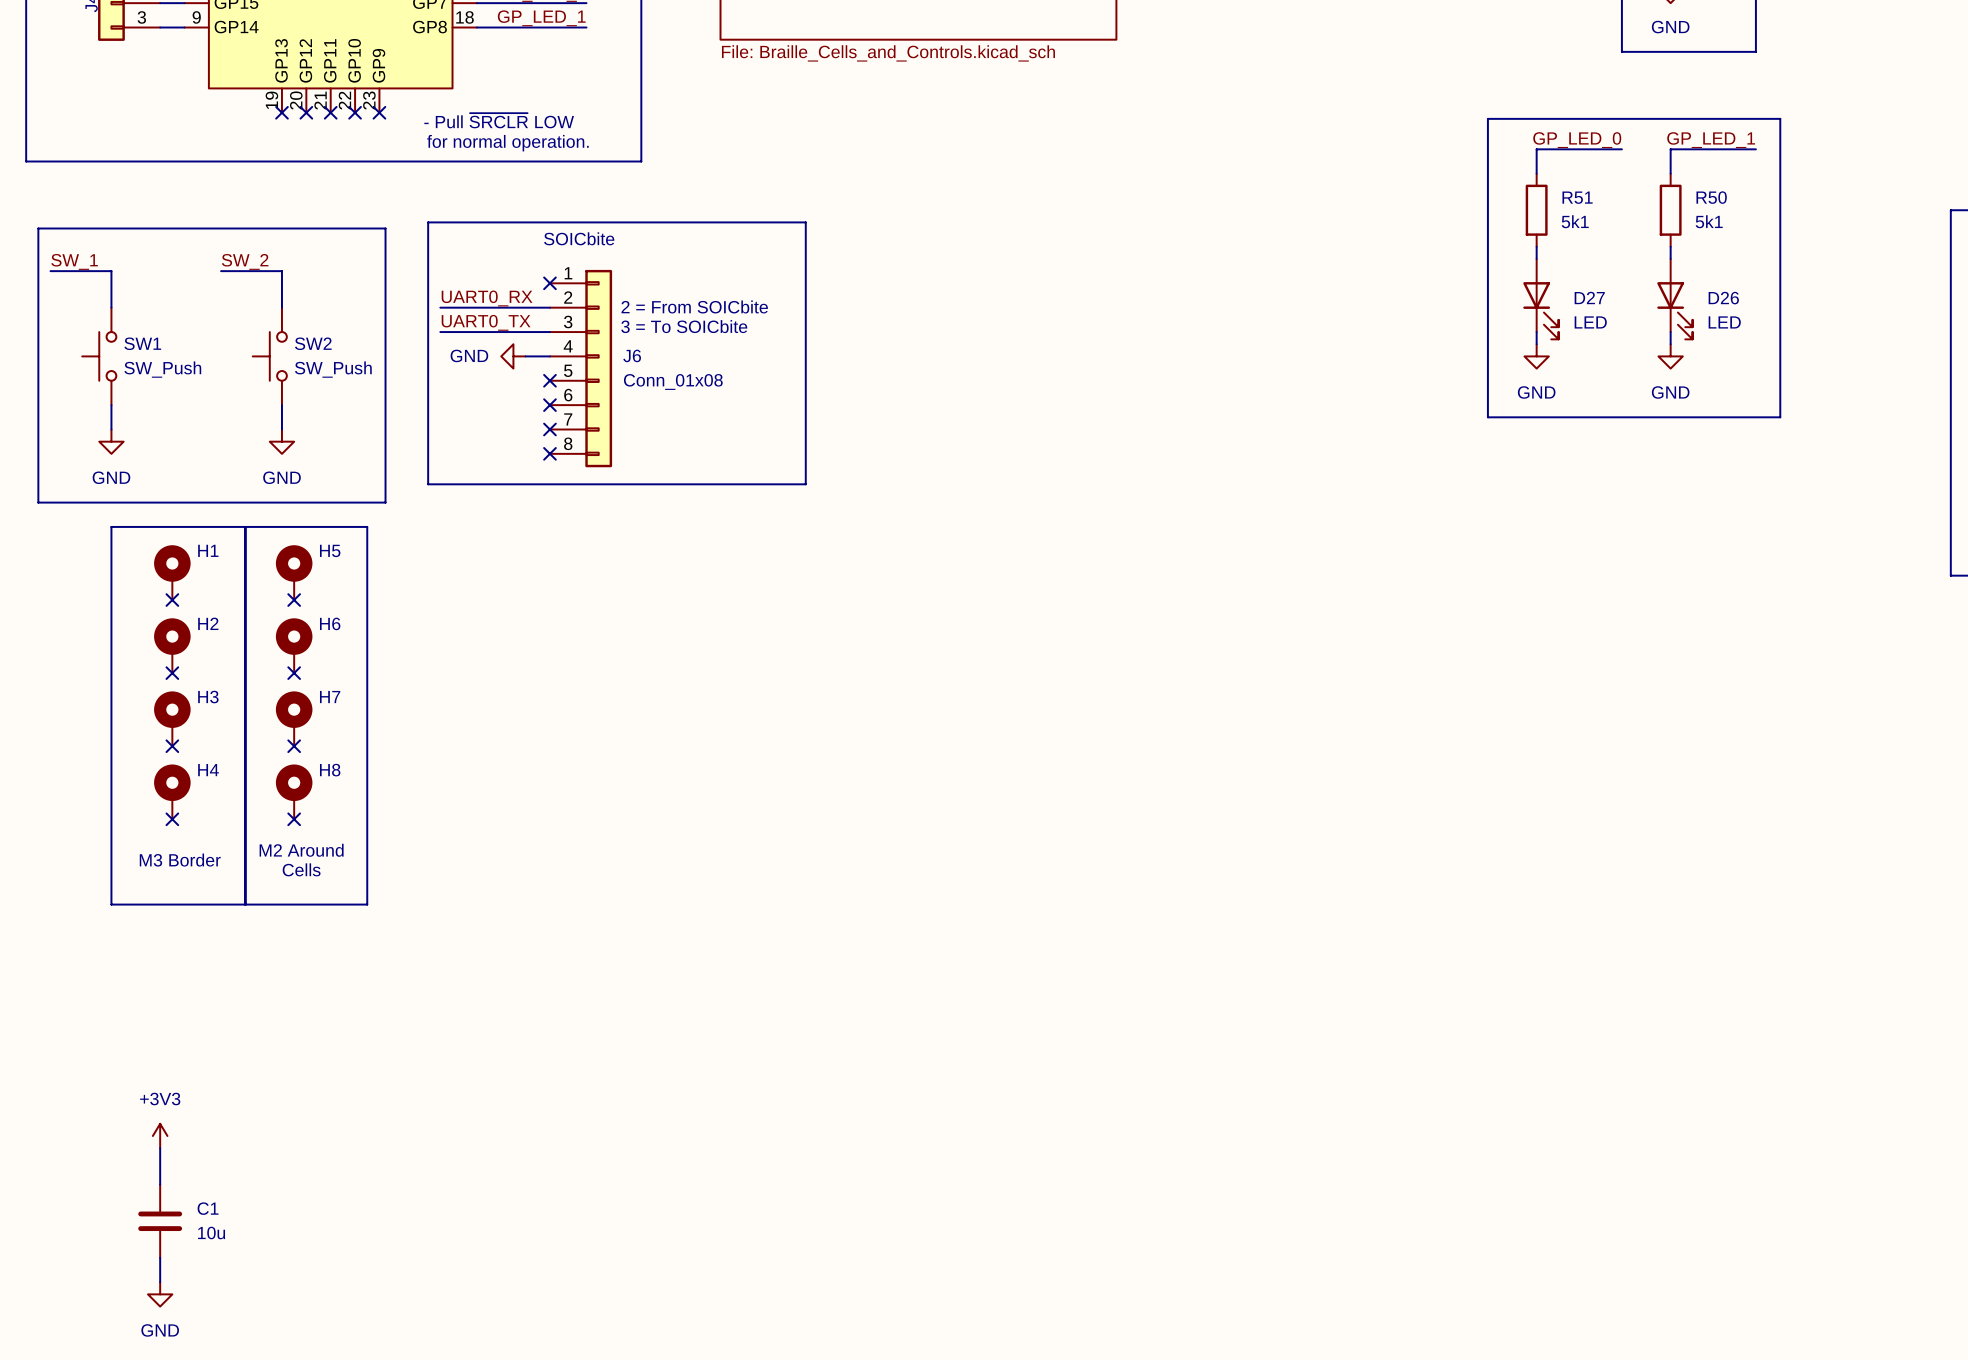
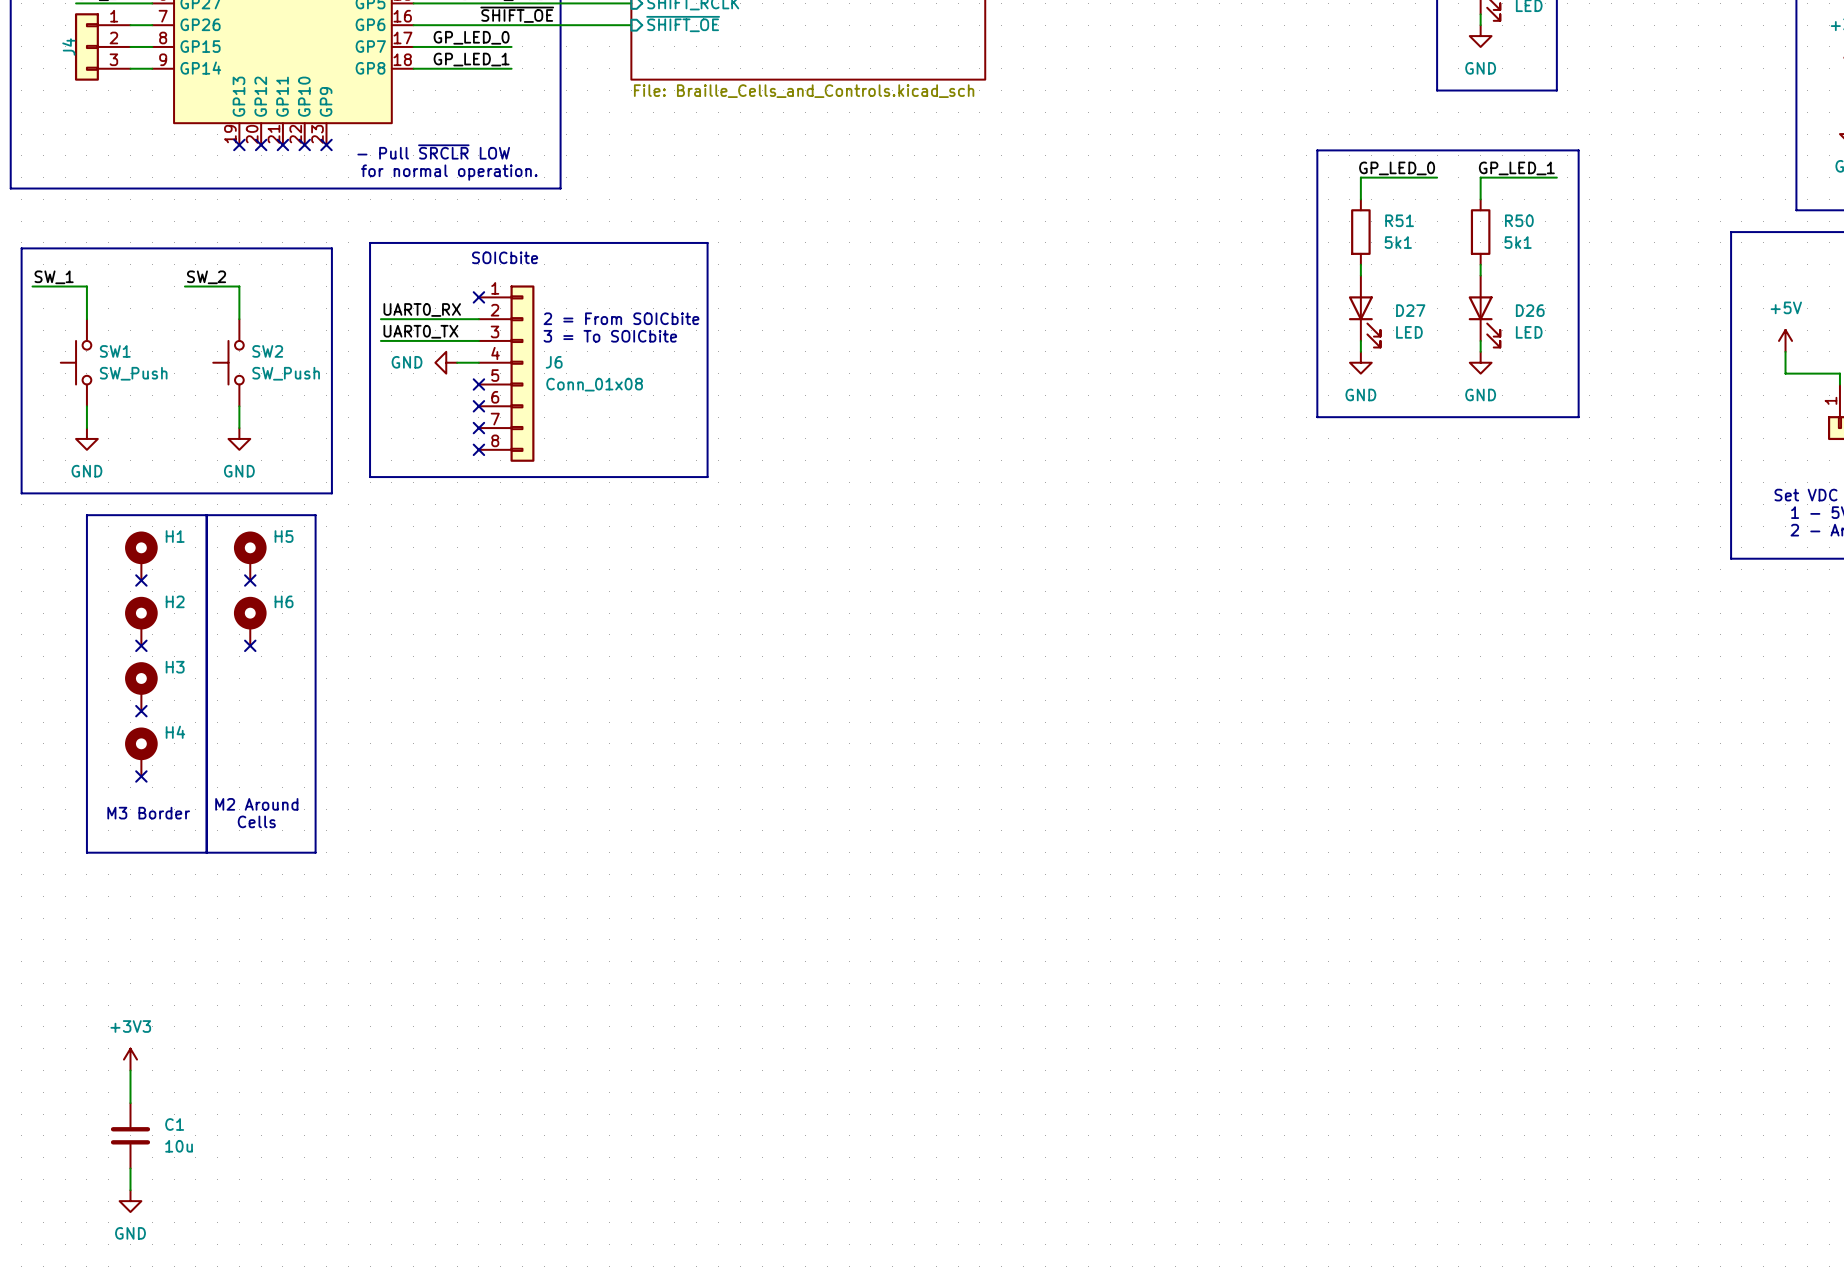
H7: (294, 718) -> none
no-connect mark: (294, 746) -> none
H8: (294, 791) -> none
no-connect mark: (294, 819) -> none

